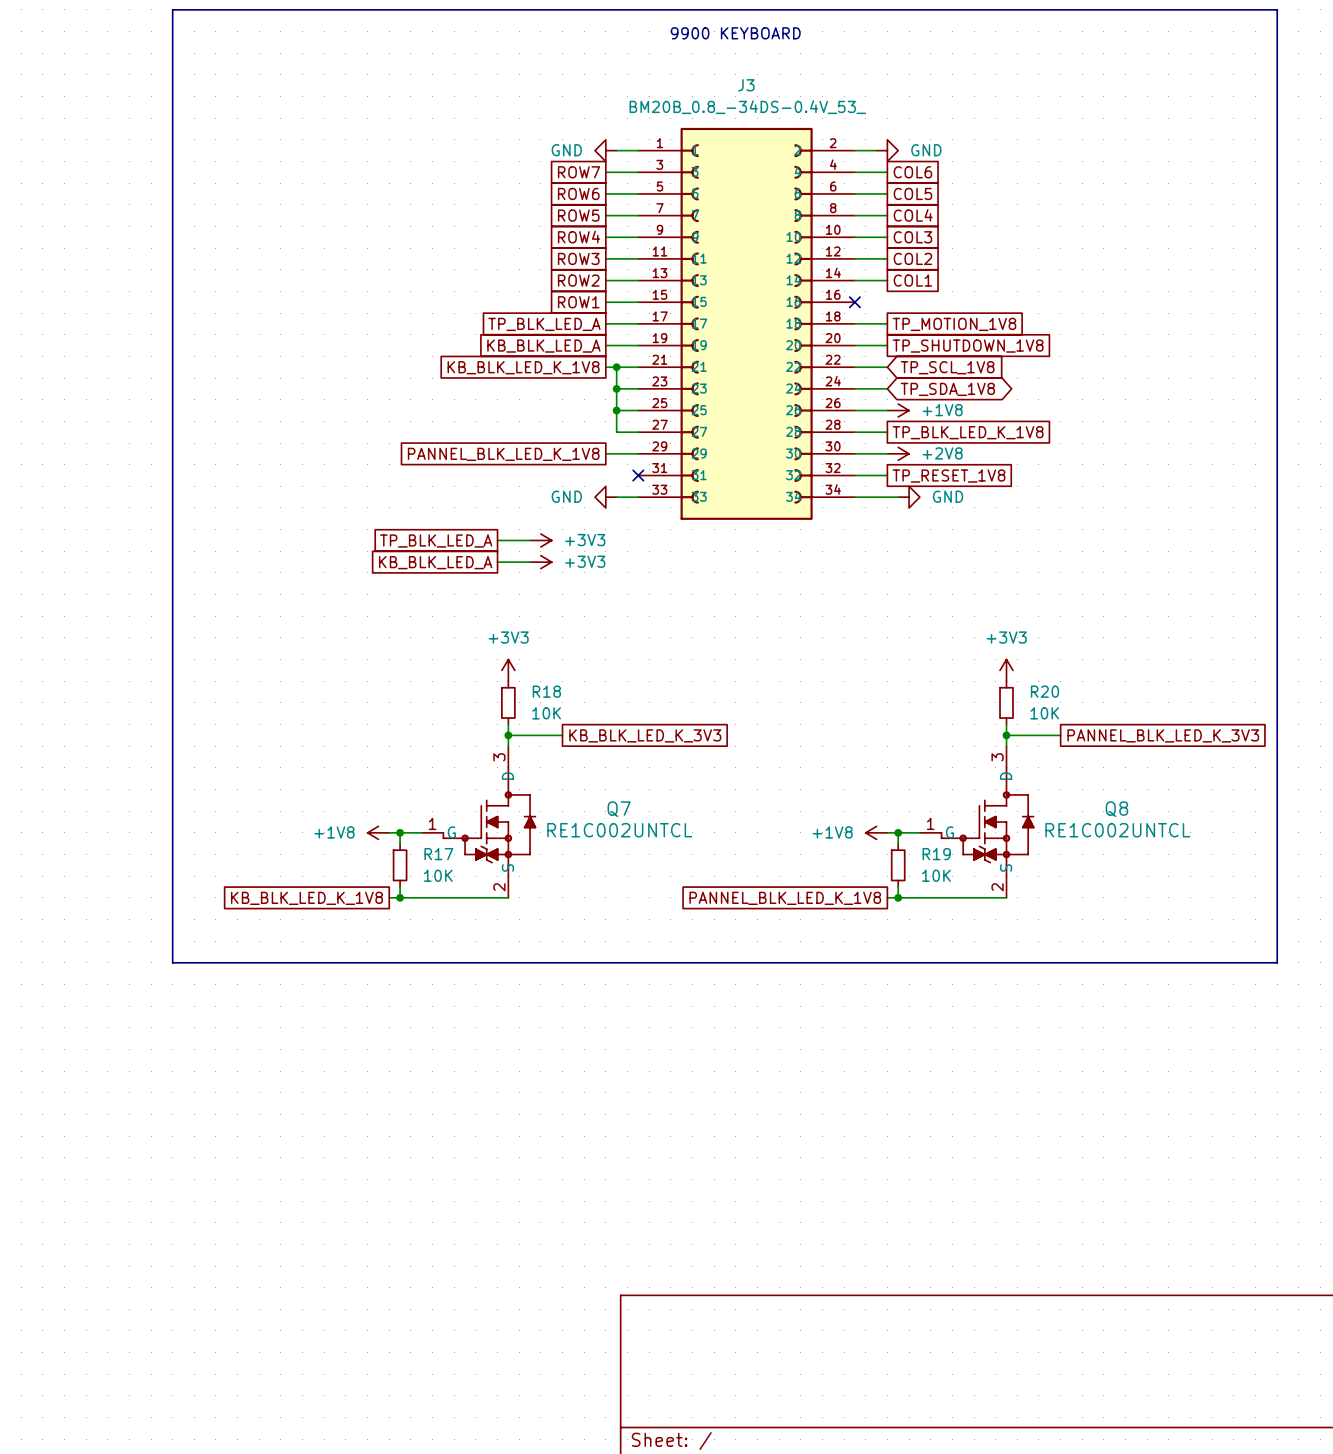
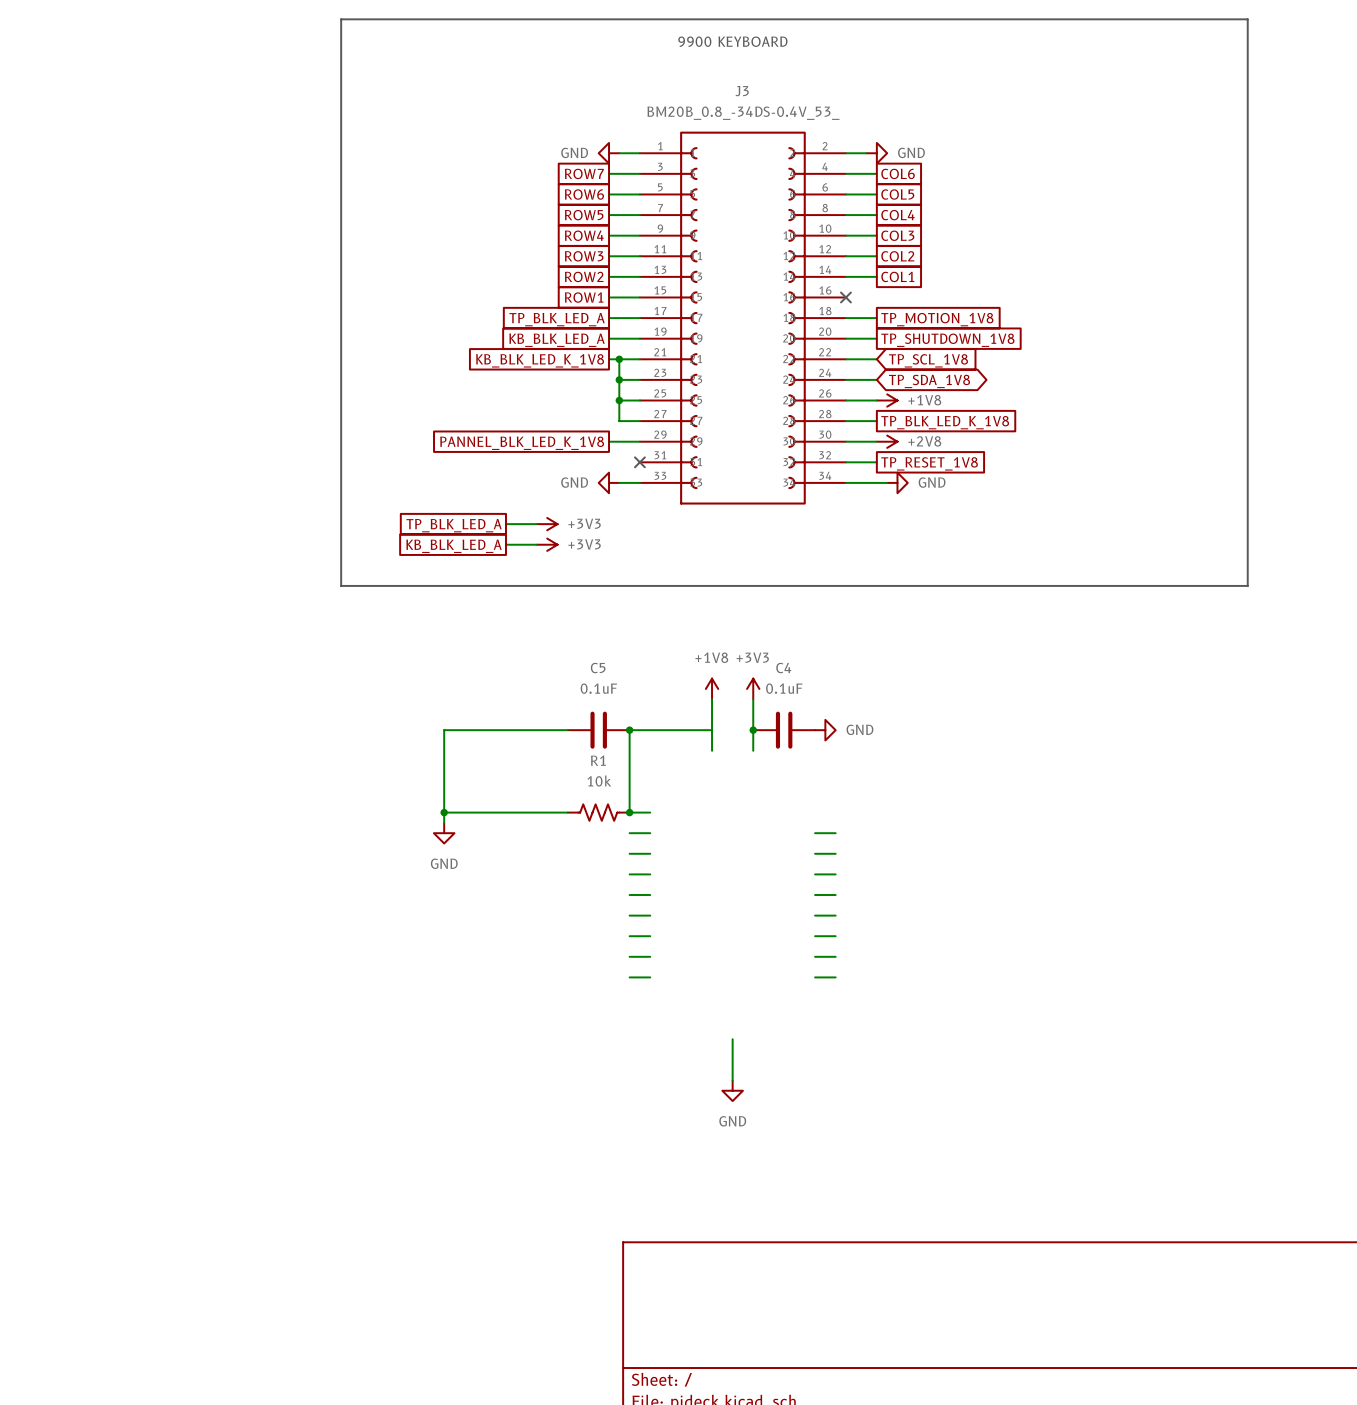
line: (324, 9) (172, 9) (172, 962) (1277, 962) (1277, 605) -> (341, 19) (341, 585) (1247, 585)
power symbol: +3V3 (508, 670) -> none
power symbol: +3V3 (1006, 670) -> none
R18: 10K (508, 702) -> none
R20: 10K (1006, 702) -> none
power symbol: none -> +1V8 (712, 688)
power symbol: none -> +3V3 (753, 688)
wire: (508, 724) (508, 746) -> none
wire: none -> (712, 699) (712, 750)
wire: none -> (753, 699) (753, 750)
wire: (1006, 724) (1006, 746) -> none
wire: (508, 735) (562, 735) -> none
junction: (508, 735) -> none
global label: KB_BLK_LED_K_3V3 (645, 735) -> none
wire: (1006, 735) (1060, 735) -> none
junction: (1006, 735) -> none
global label: PANNEL_BLK_LED_K_3V3 (1163, 735) -> none
wire: none -> (567, 730) (444, 730) (444, 822)
C5: none -> 0.1uF (598, 730)
junction: none -> (629, 730)
wire: none -> (712, 730) (629, 730) (629, 812) (650, 812)
junction: none -> (753, 730)
C4: none -> 0.1uF (784, 730)
power symbol: none -> GND (825, 730)
Q7: RE1C002UNTCL (478, 822) -> none
Q8: RE1C002UNTCL (976, 822) -> none
power symbol: +1V8 (378, 832) -> none
wire: (389, 832) (421, 832) -> none
wire: (400, 832) (400, 843) -> none
junction: (400, 832) -> none
power symbol: +1V8 (876, 832) -> none
wire: (887, 832) (919, 832) -> none
wire: (898, 832) (898, 843) -> none
junction: (898, 832) -> none
wire: none -> (444, 812) (567, 812)
junction: none -> (444, 812)
R1: none -> 10k (598, 812)
junction: none -> (629, 812)
R17: 10K (400, 865) -> none
power symbol: none -> GND (444, 833)
wire: none -> (629, 833) (650, 833)
wire: none -> (815, 833) (835, 833)
R19: 10K (898, 865) -> none
wire: (400, 887) (400, 897) -> none
wire: none -> (629, 853) (650, 853)
wire: (898, 887) (898, 897) -> none
wire: (389, 897) (508, 897) -> none
junction: (400, 897) -> none
wire: (887, 897) (1006, 897) -> none
junction: (898, 897) -> none
global label: KB_BLK_LED_K_1V8 (306, 898) -> none
global label: PANNEL_BLK_LED_K_1V8 (785, 898) -> none
wire: none -> (629, 874) (650, 874)
wire: none -> (629, 895) (650, 895)
wire: none -> (815, 895) (835, 895)
wire: none -> (629, 915) (650, 915)
wire: none -> (815, 915) (835, 915)
wire: none -> (629, 936) (650, 936)
wire: none -> (815, 936) (835, 936)
wire: none -> (629, 956) (650, 956)
wire: none -> (815, 956) (835, 956)
wire: none -> (629, 977) (650, 977)
wire: none -> (815, 977) (835, 977)
wire: none -> (732, 1039) (732, 1080)
power symbol: none -> GND (732, 1090)

